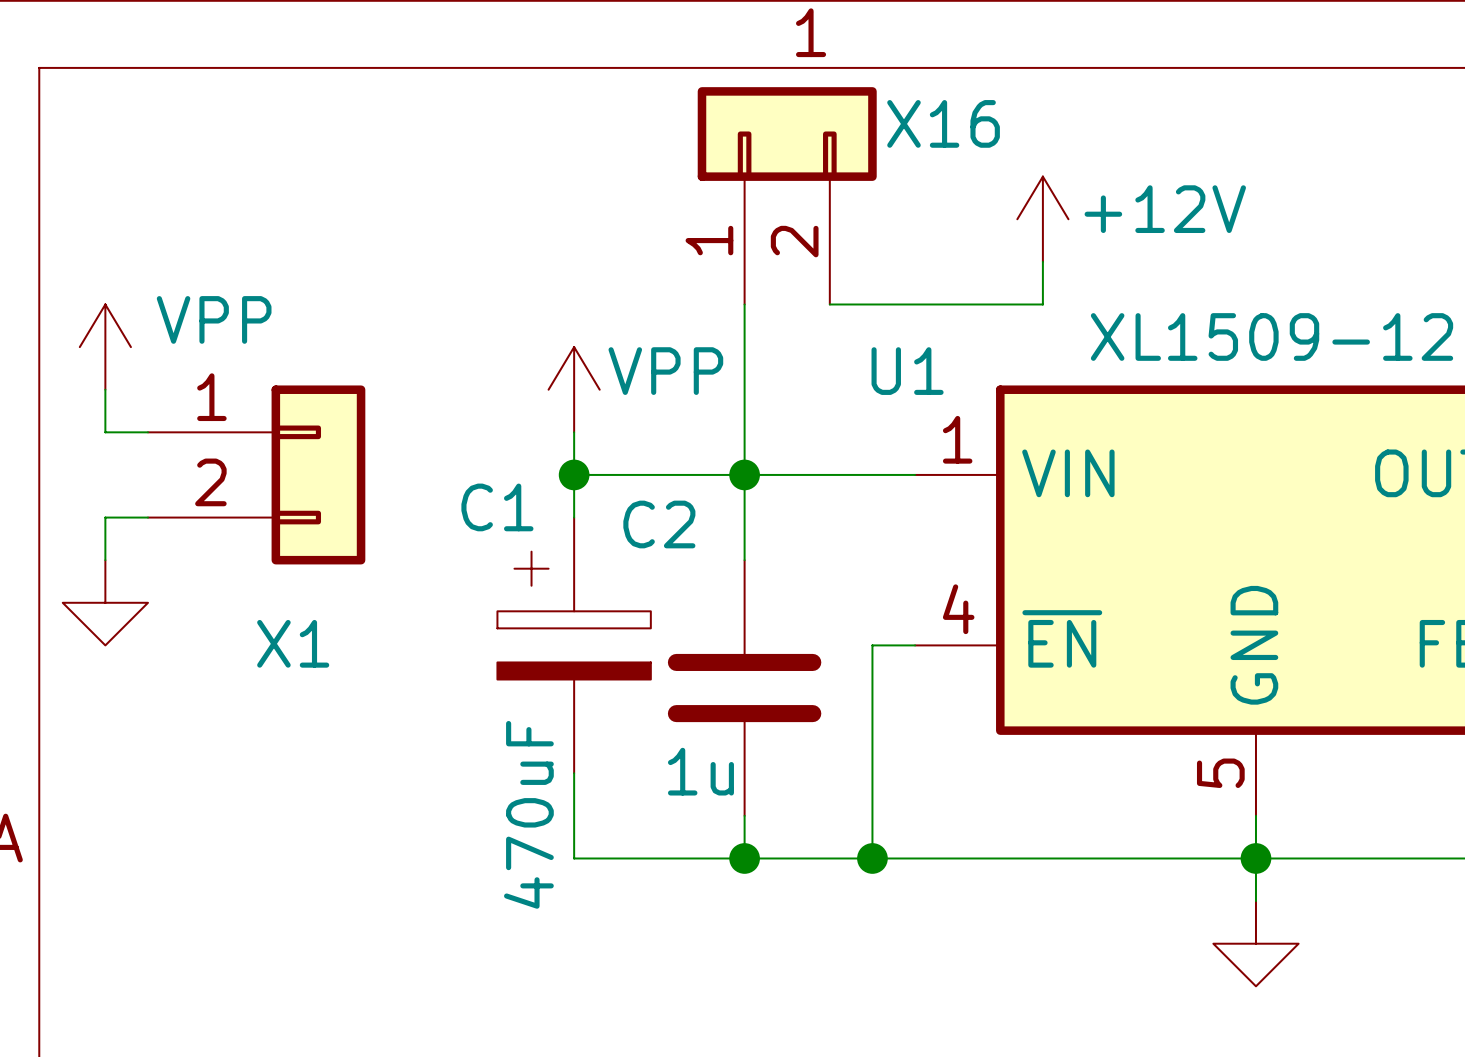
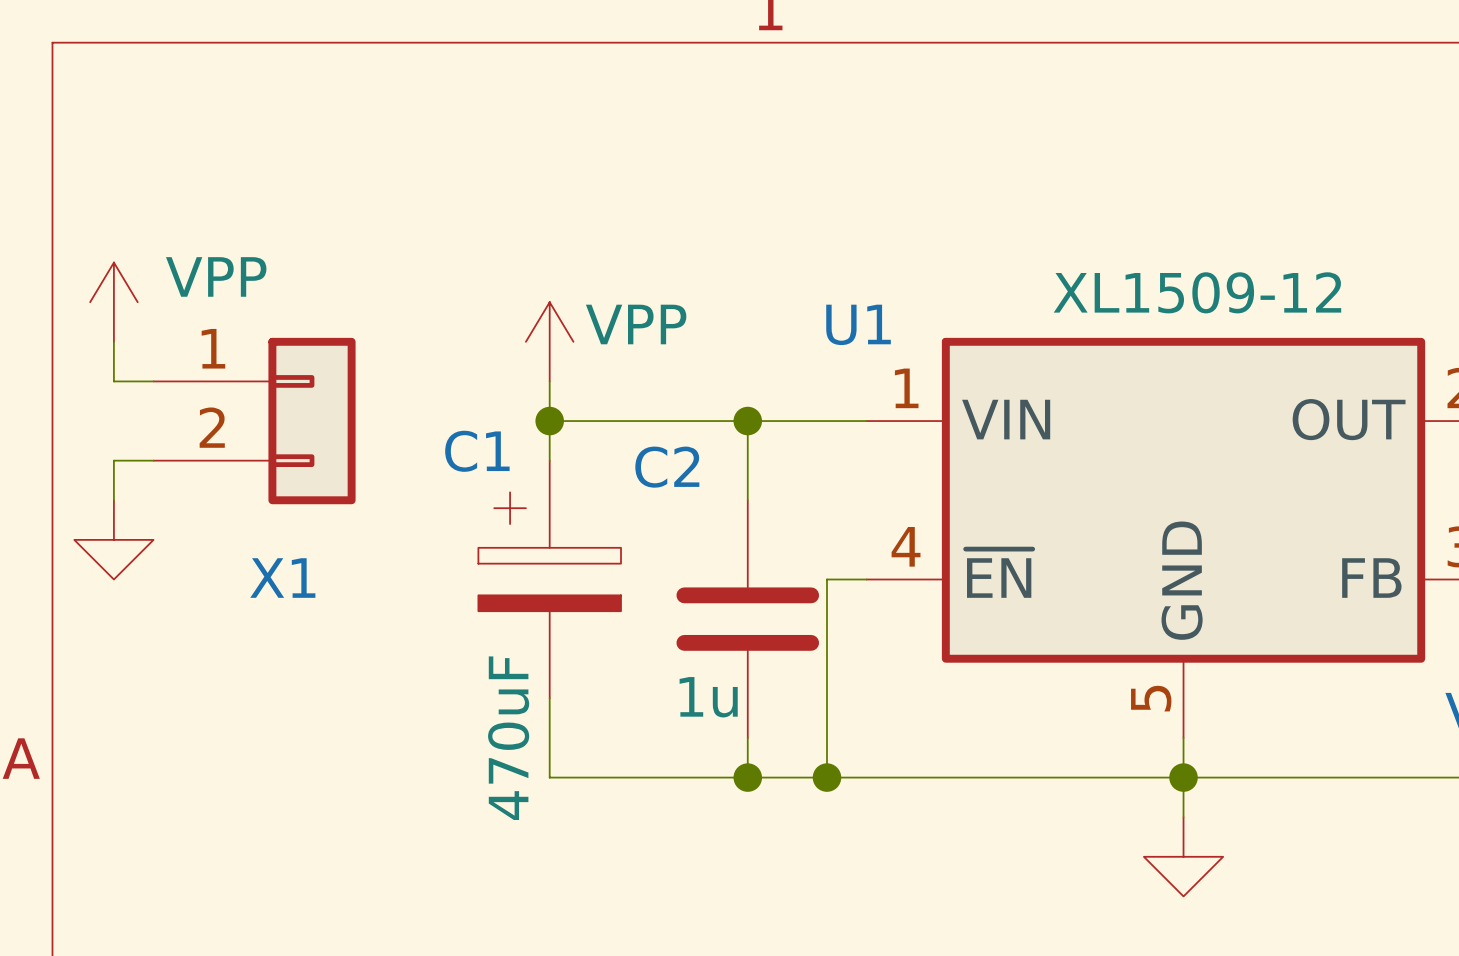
X16: (787, 195) -> none
power symbol: +12V (1042, 219) -> none
wire: (1042, 261) (1042, 304) (829, 304) -> none
wire: (744, 304) (744, 560) -> none
junction position: (744, 474) -> (747, 421)
wire: none -> (747, 421) (747, 500)
C2 position: (744, 688) -> (747, 619)
wire: (744, 815) (744, 858) -> (747, 737) (747, 777)
junction position: (744, 858) -> (747, 777)

